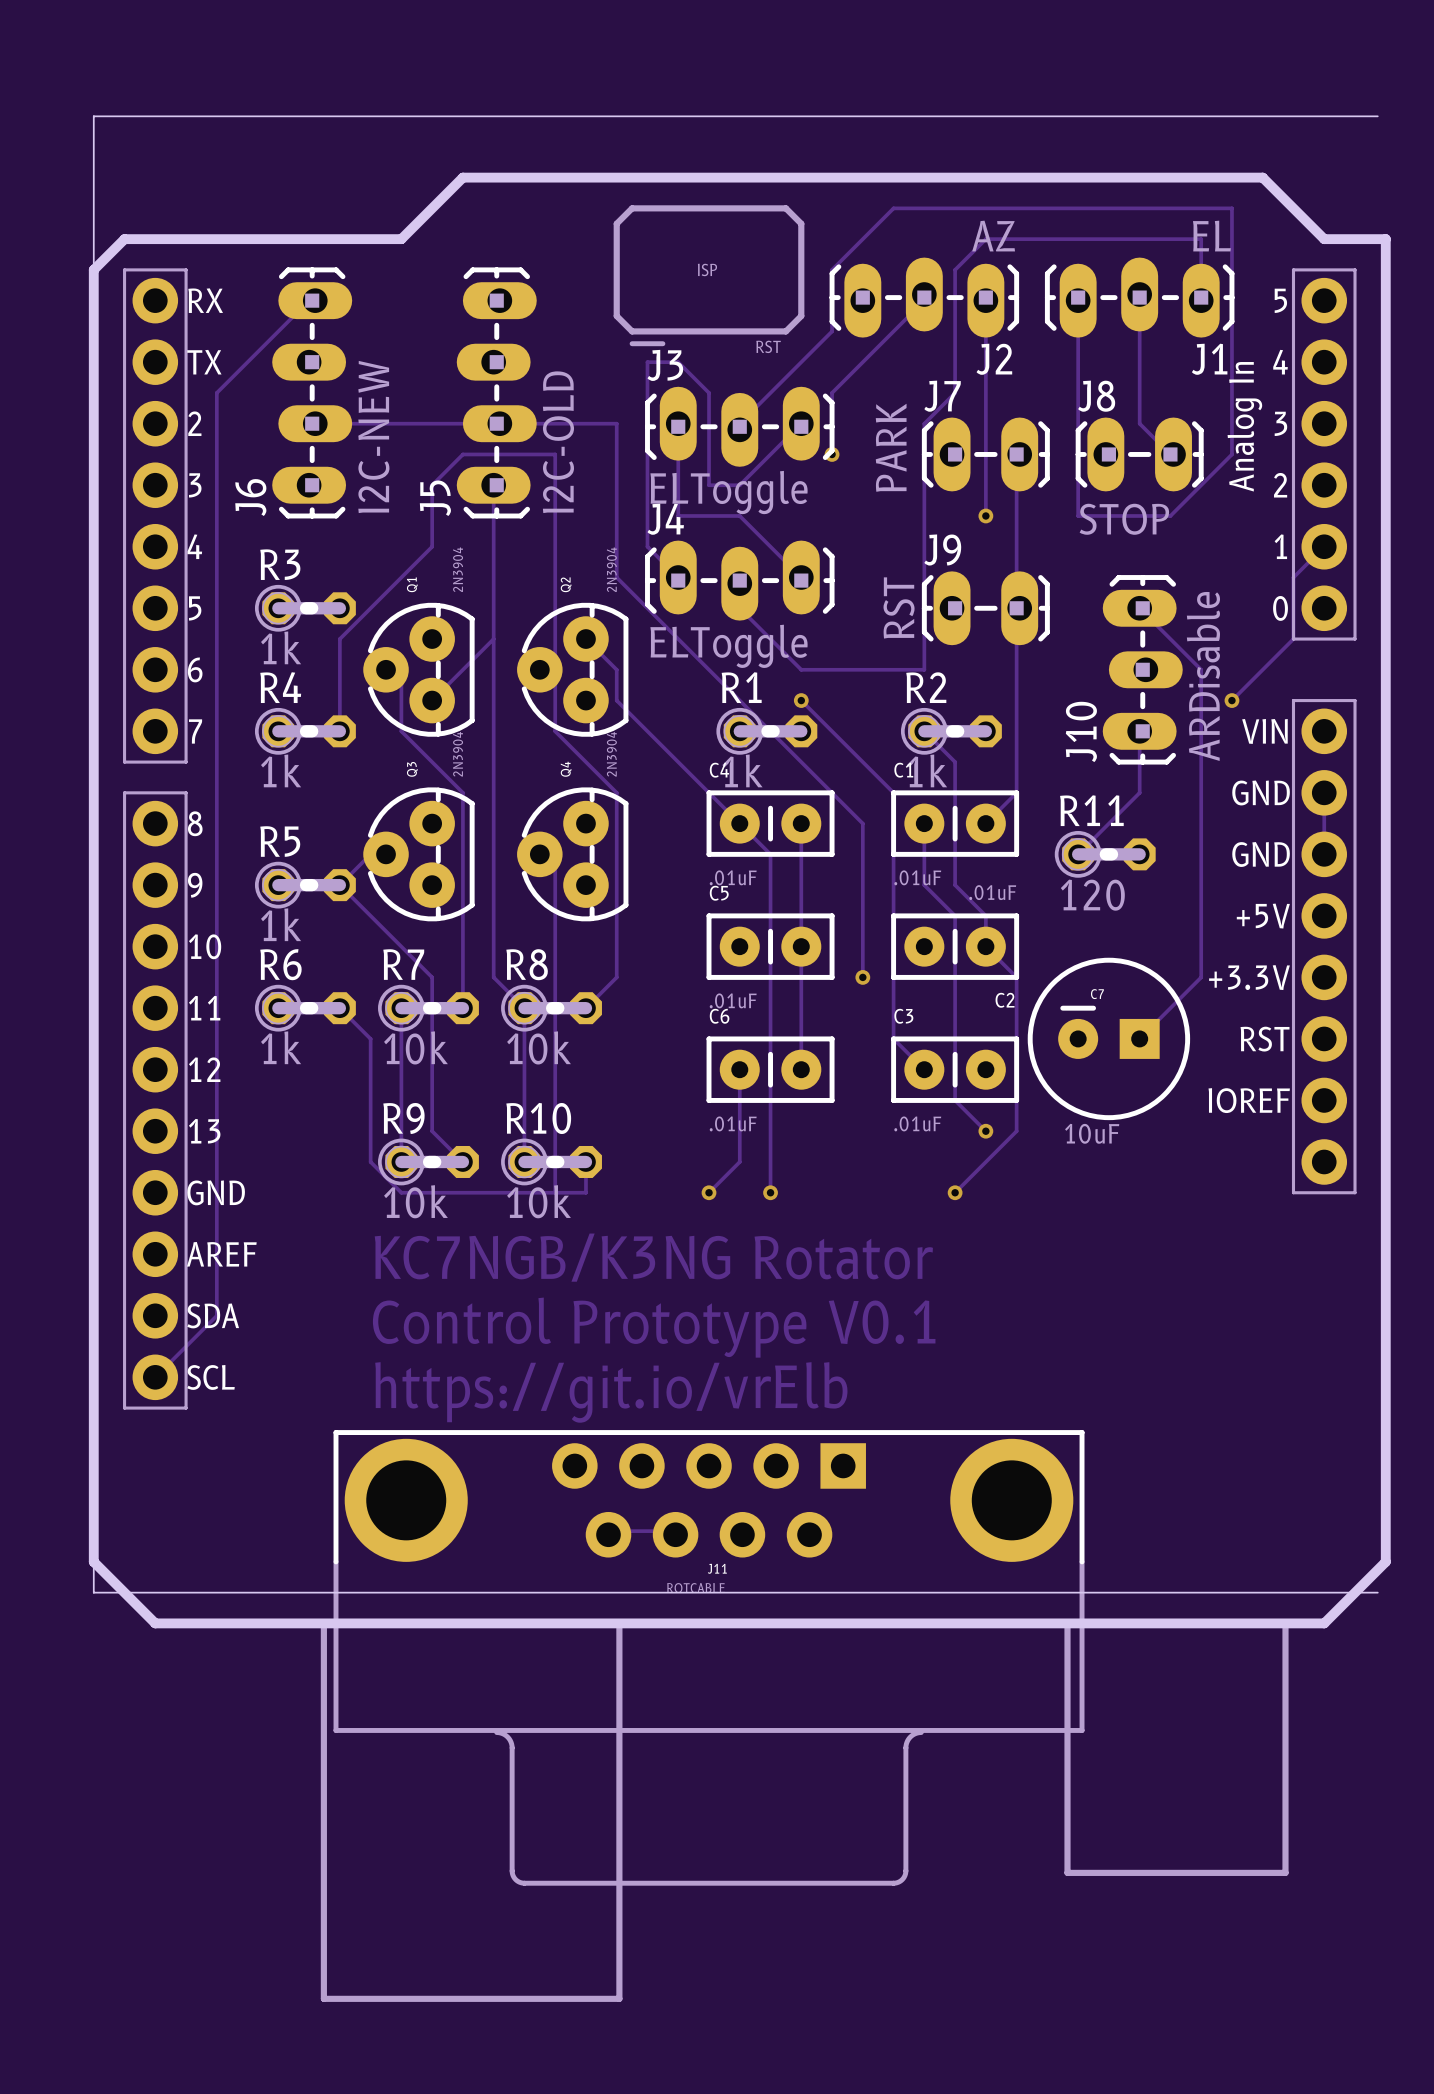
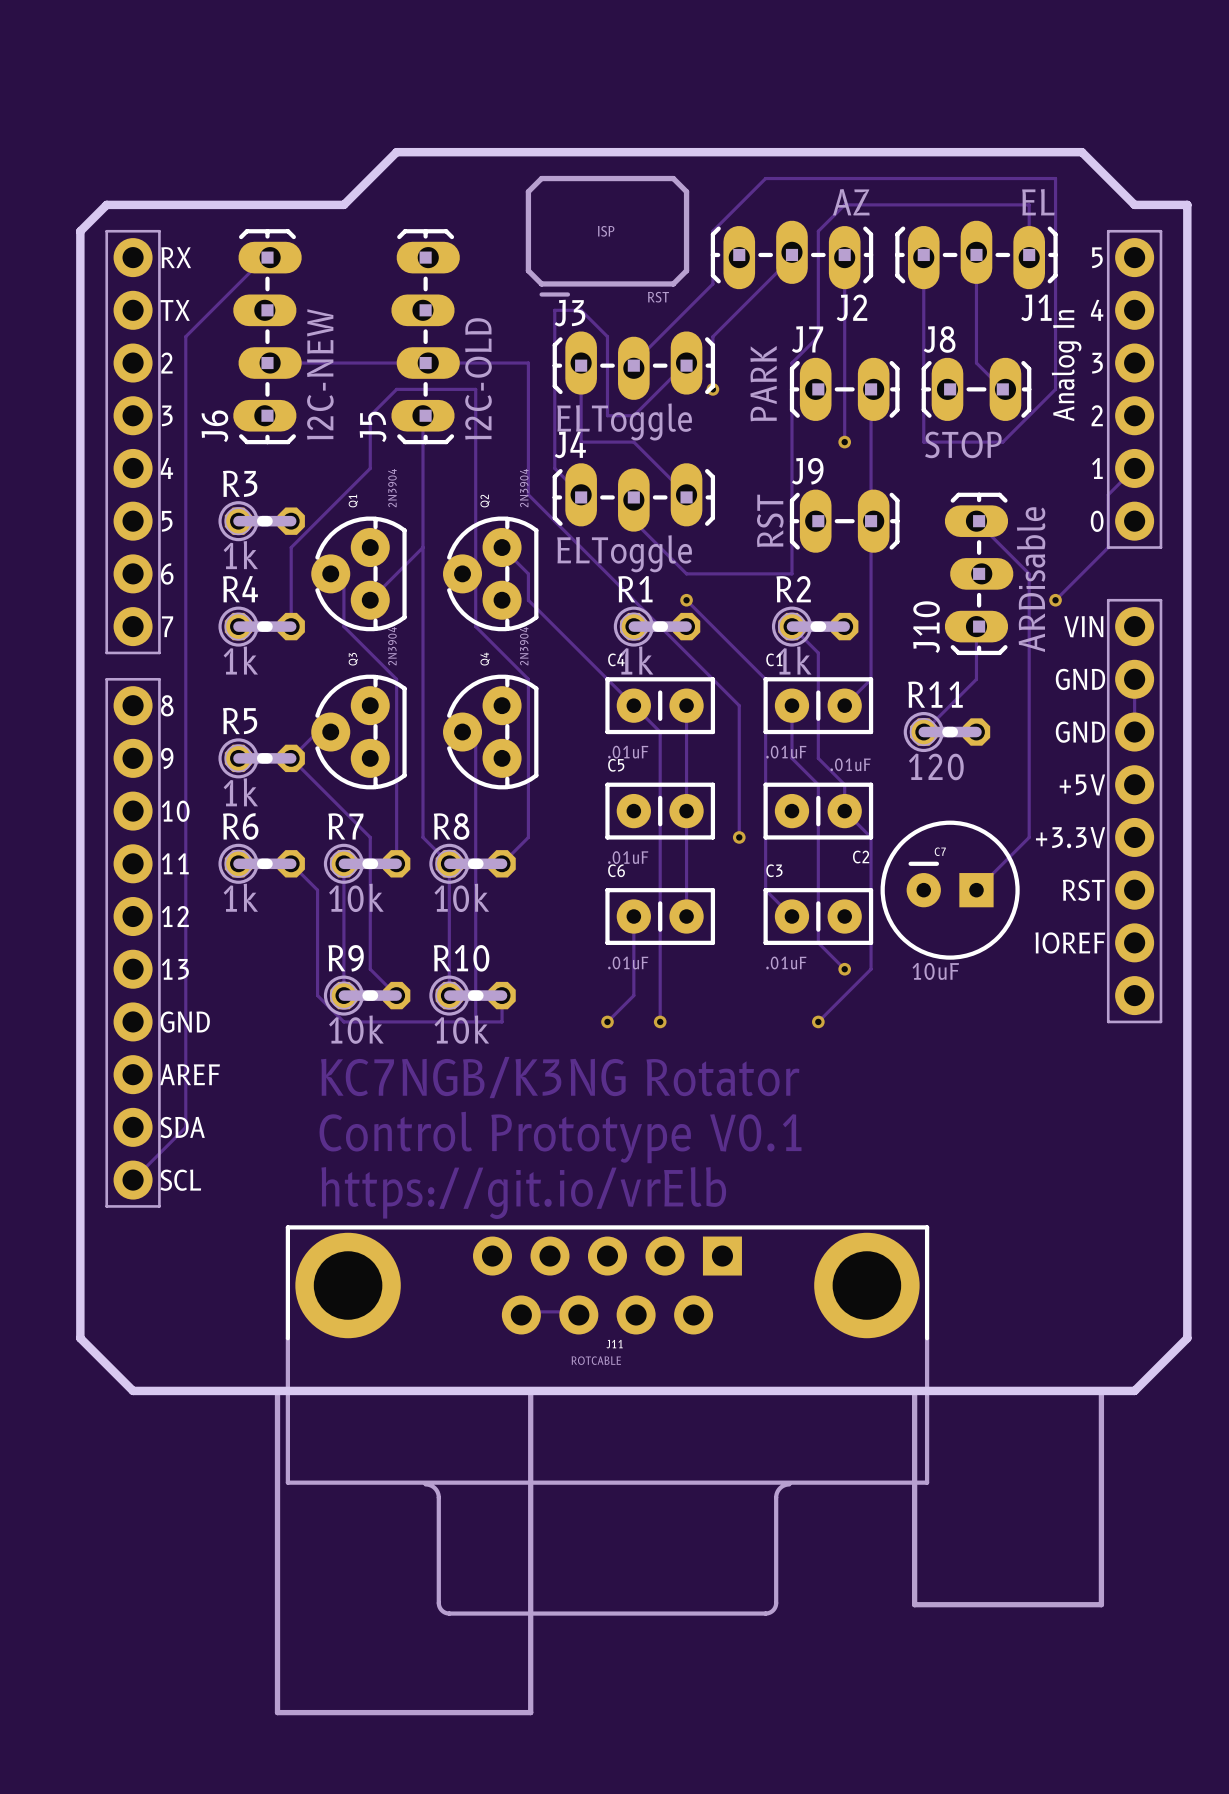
board edge: (1377, 116) (93, 116) (93, 269) -> none
board edge: (93, 1561) (93, 1592) (1377, 1592) -> none

